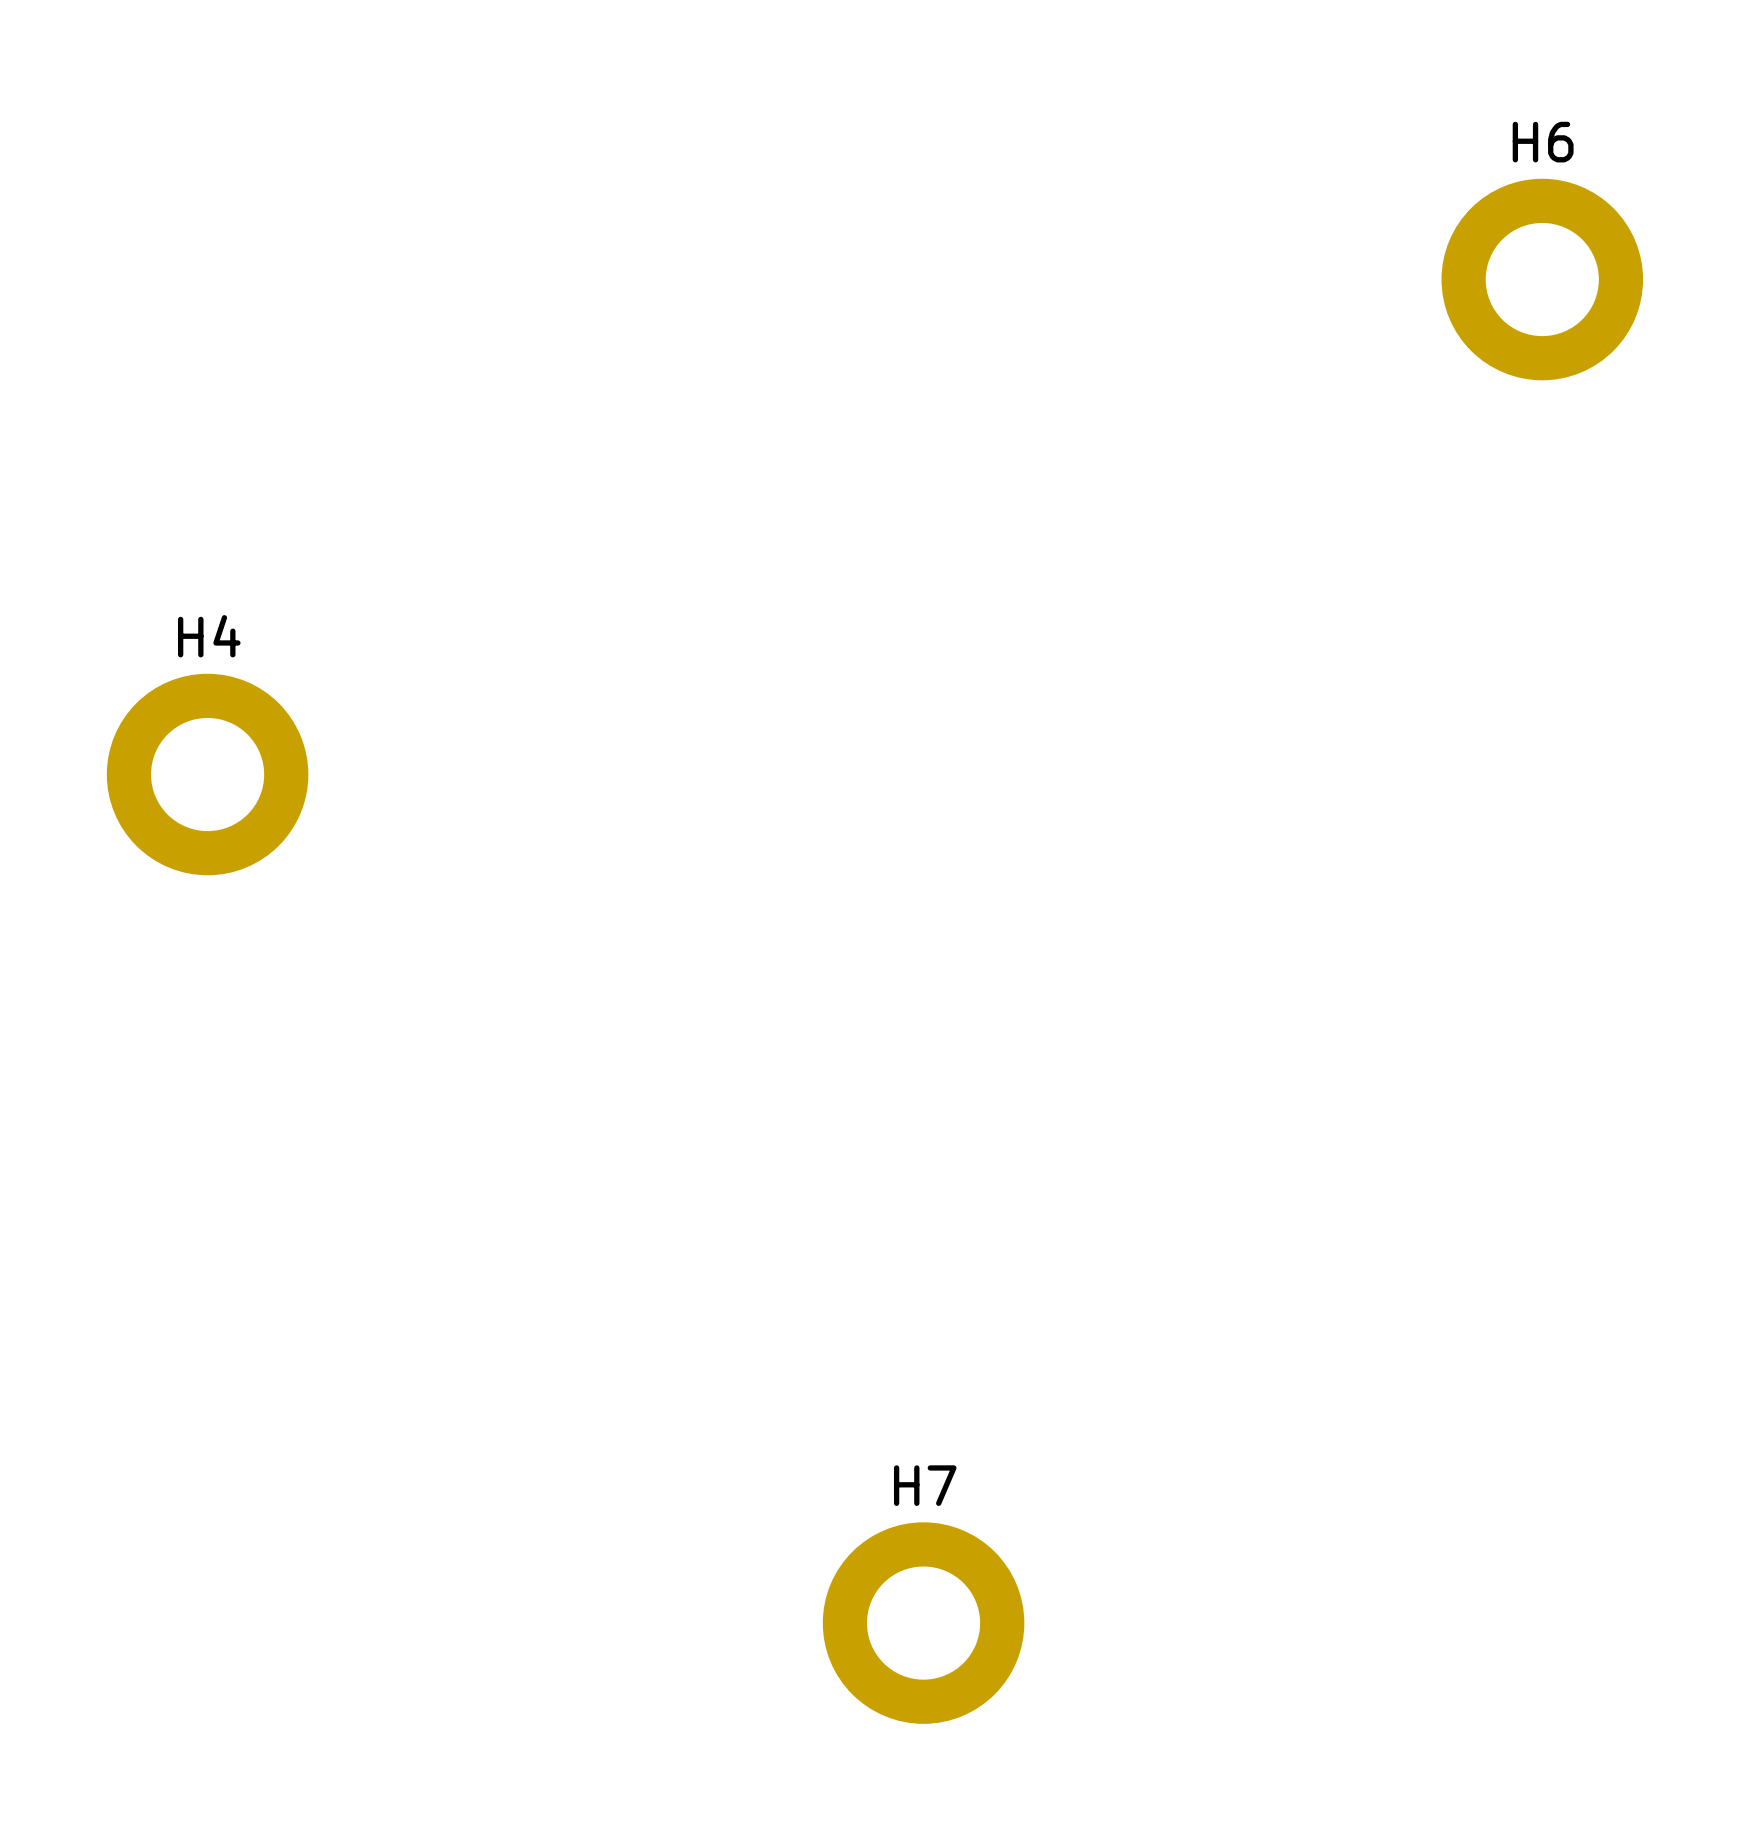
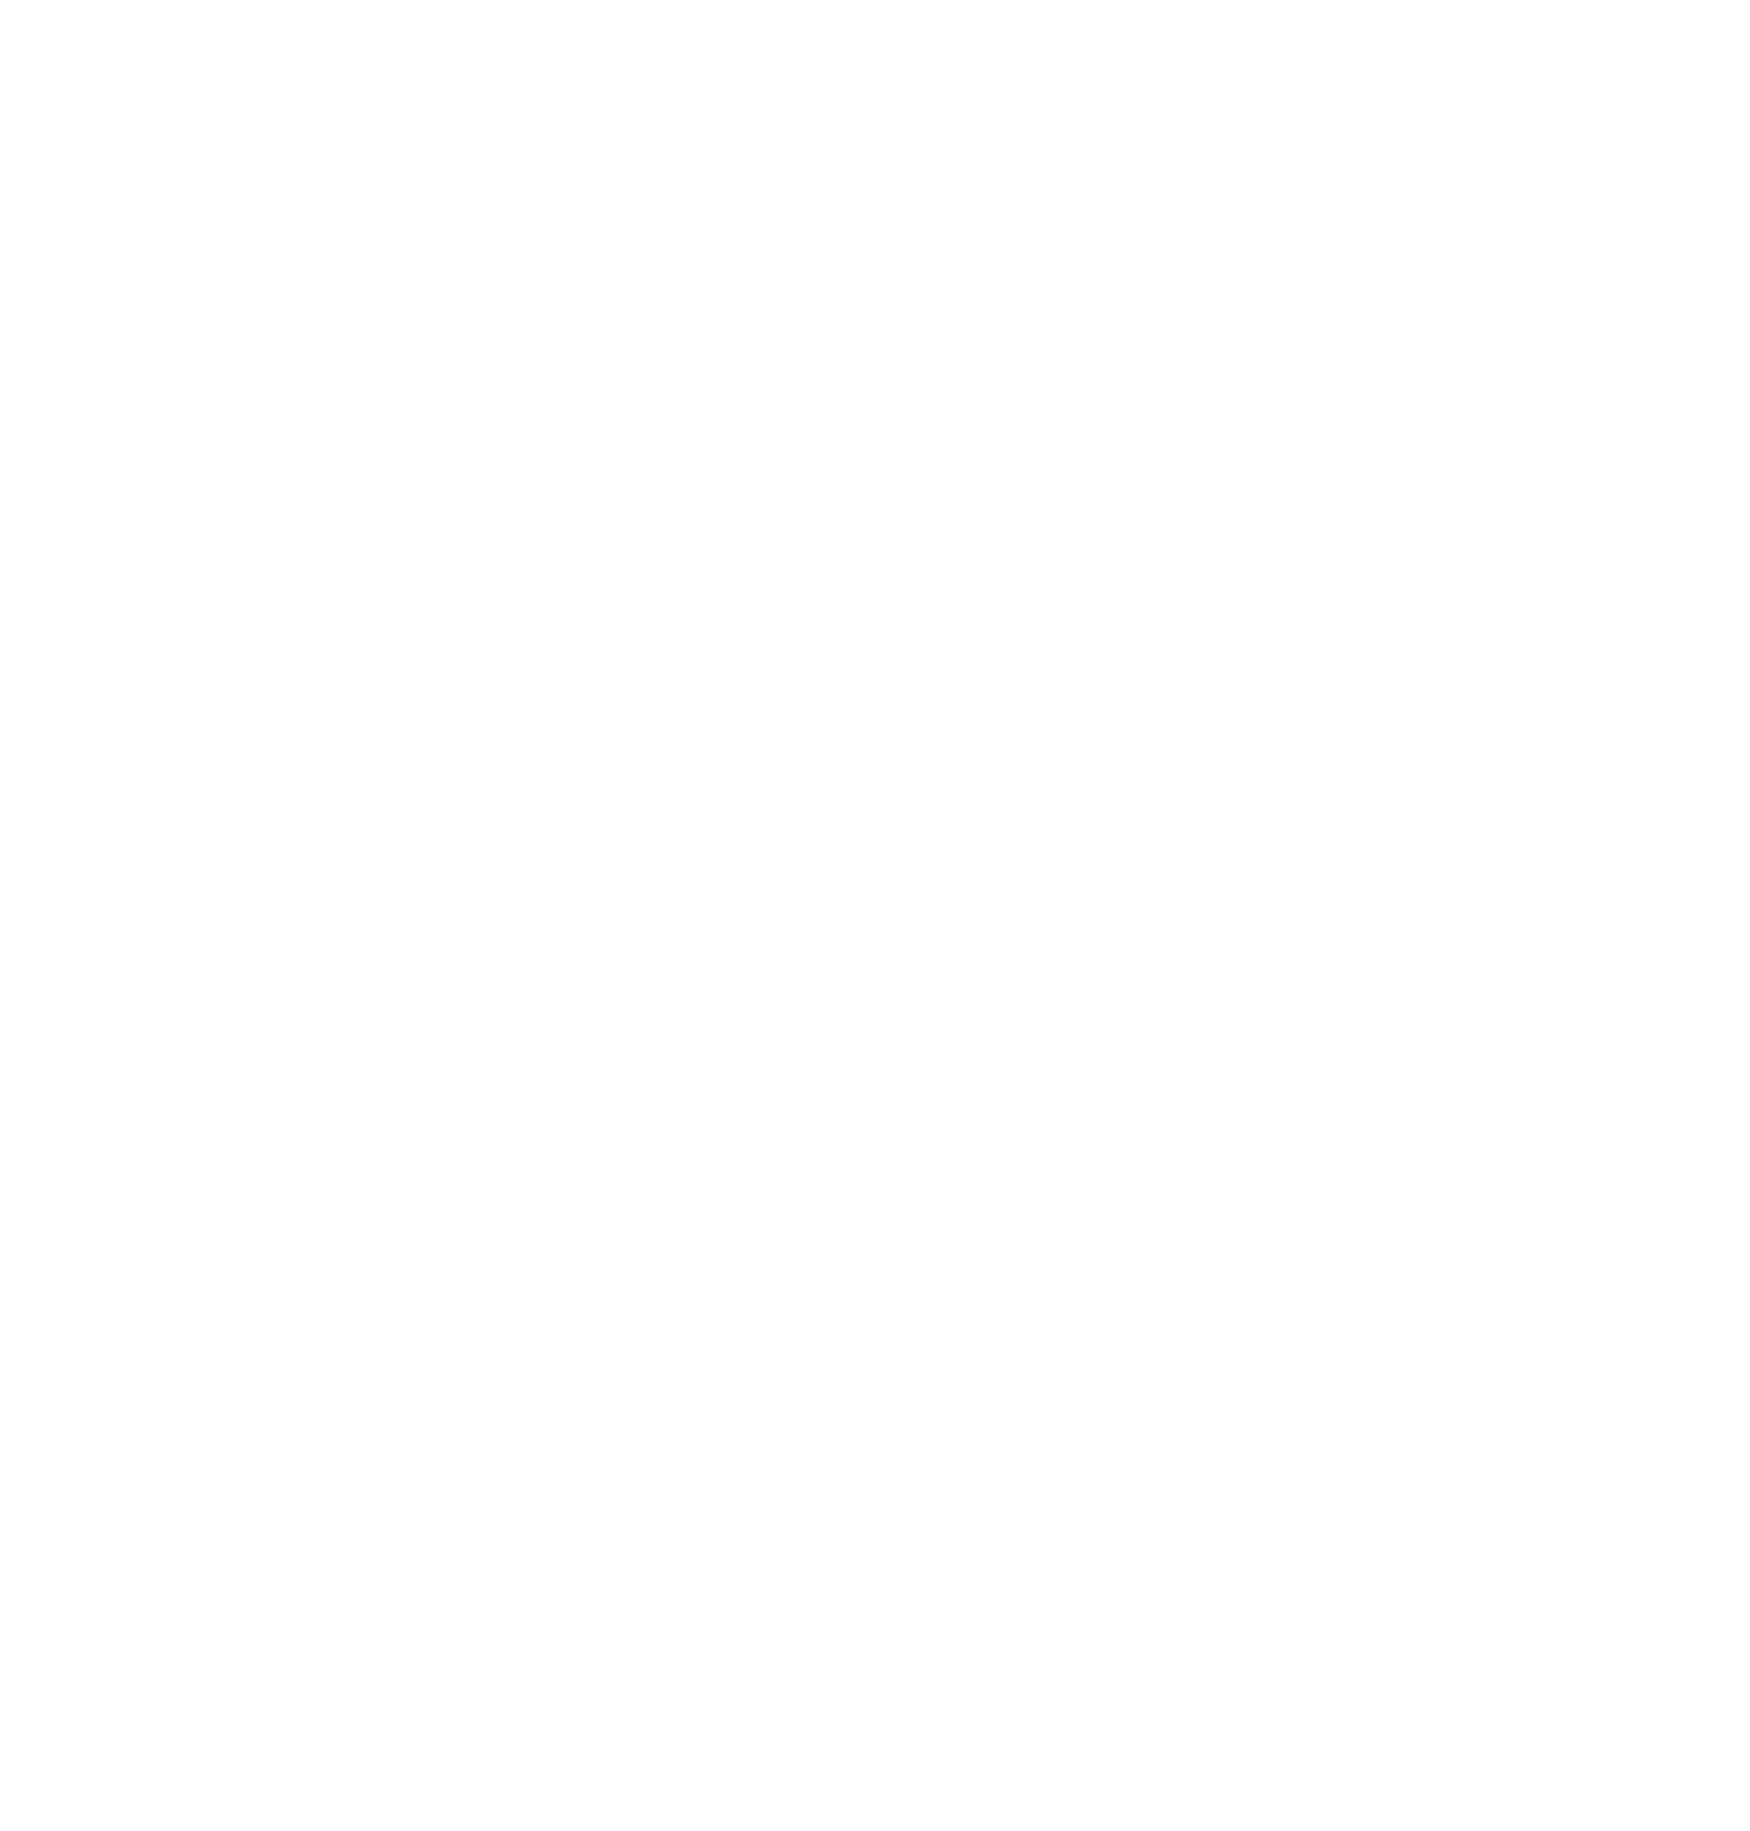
H6: (1542, 279) -> none
H4: (207, 774) -> none
H7: (923, 1623) -> none

